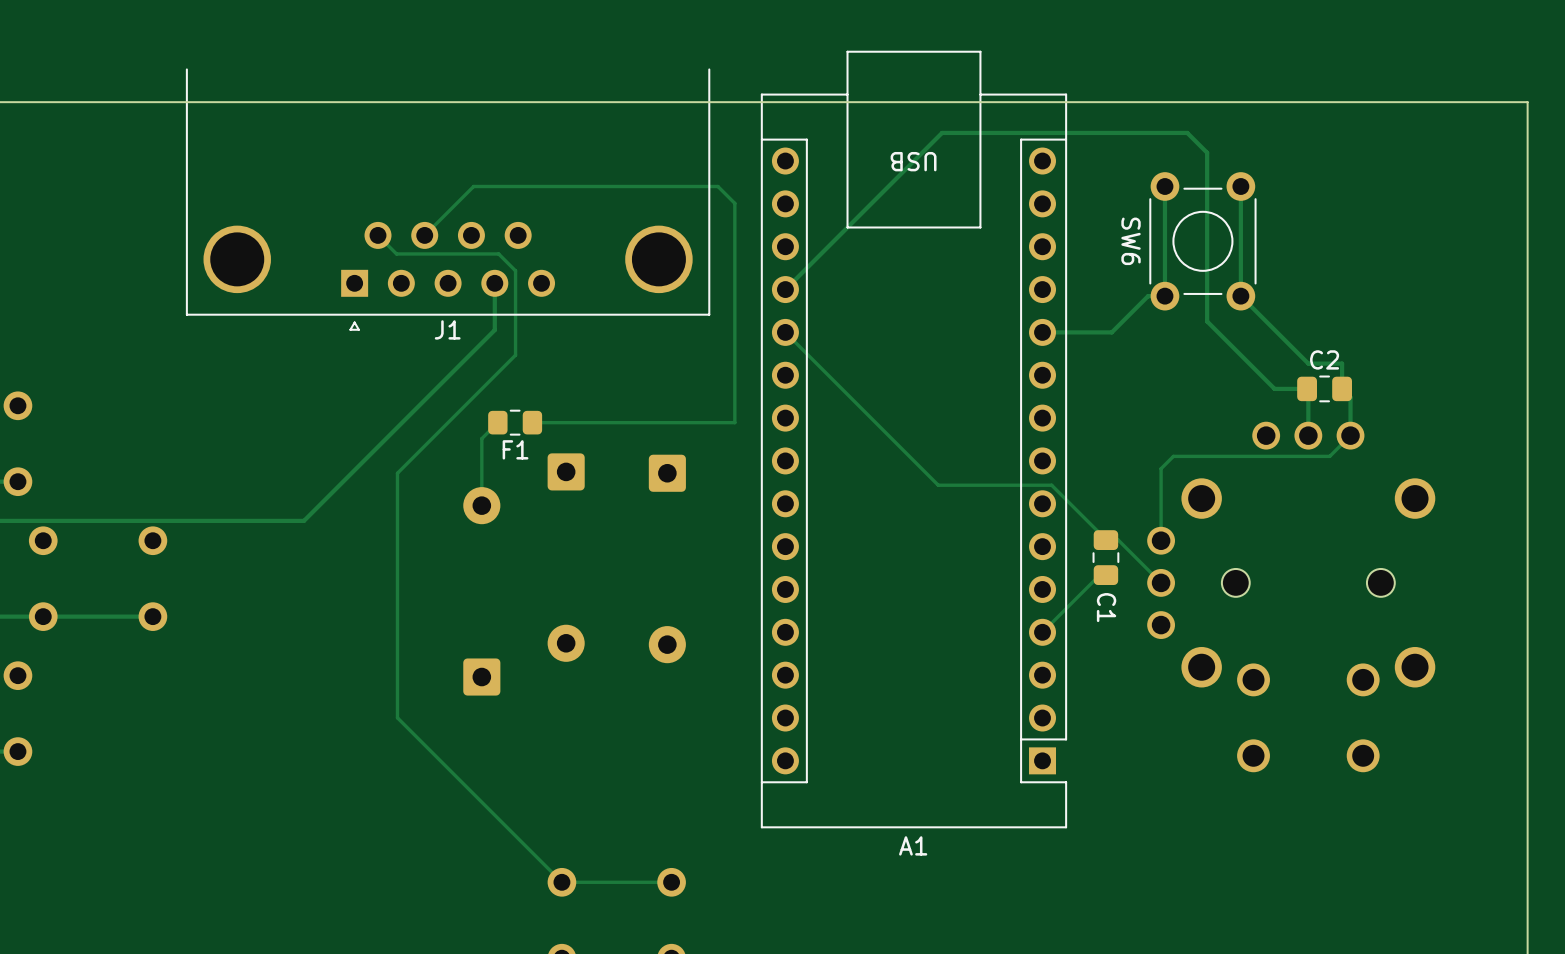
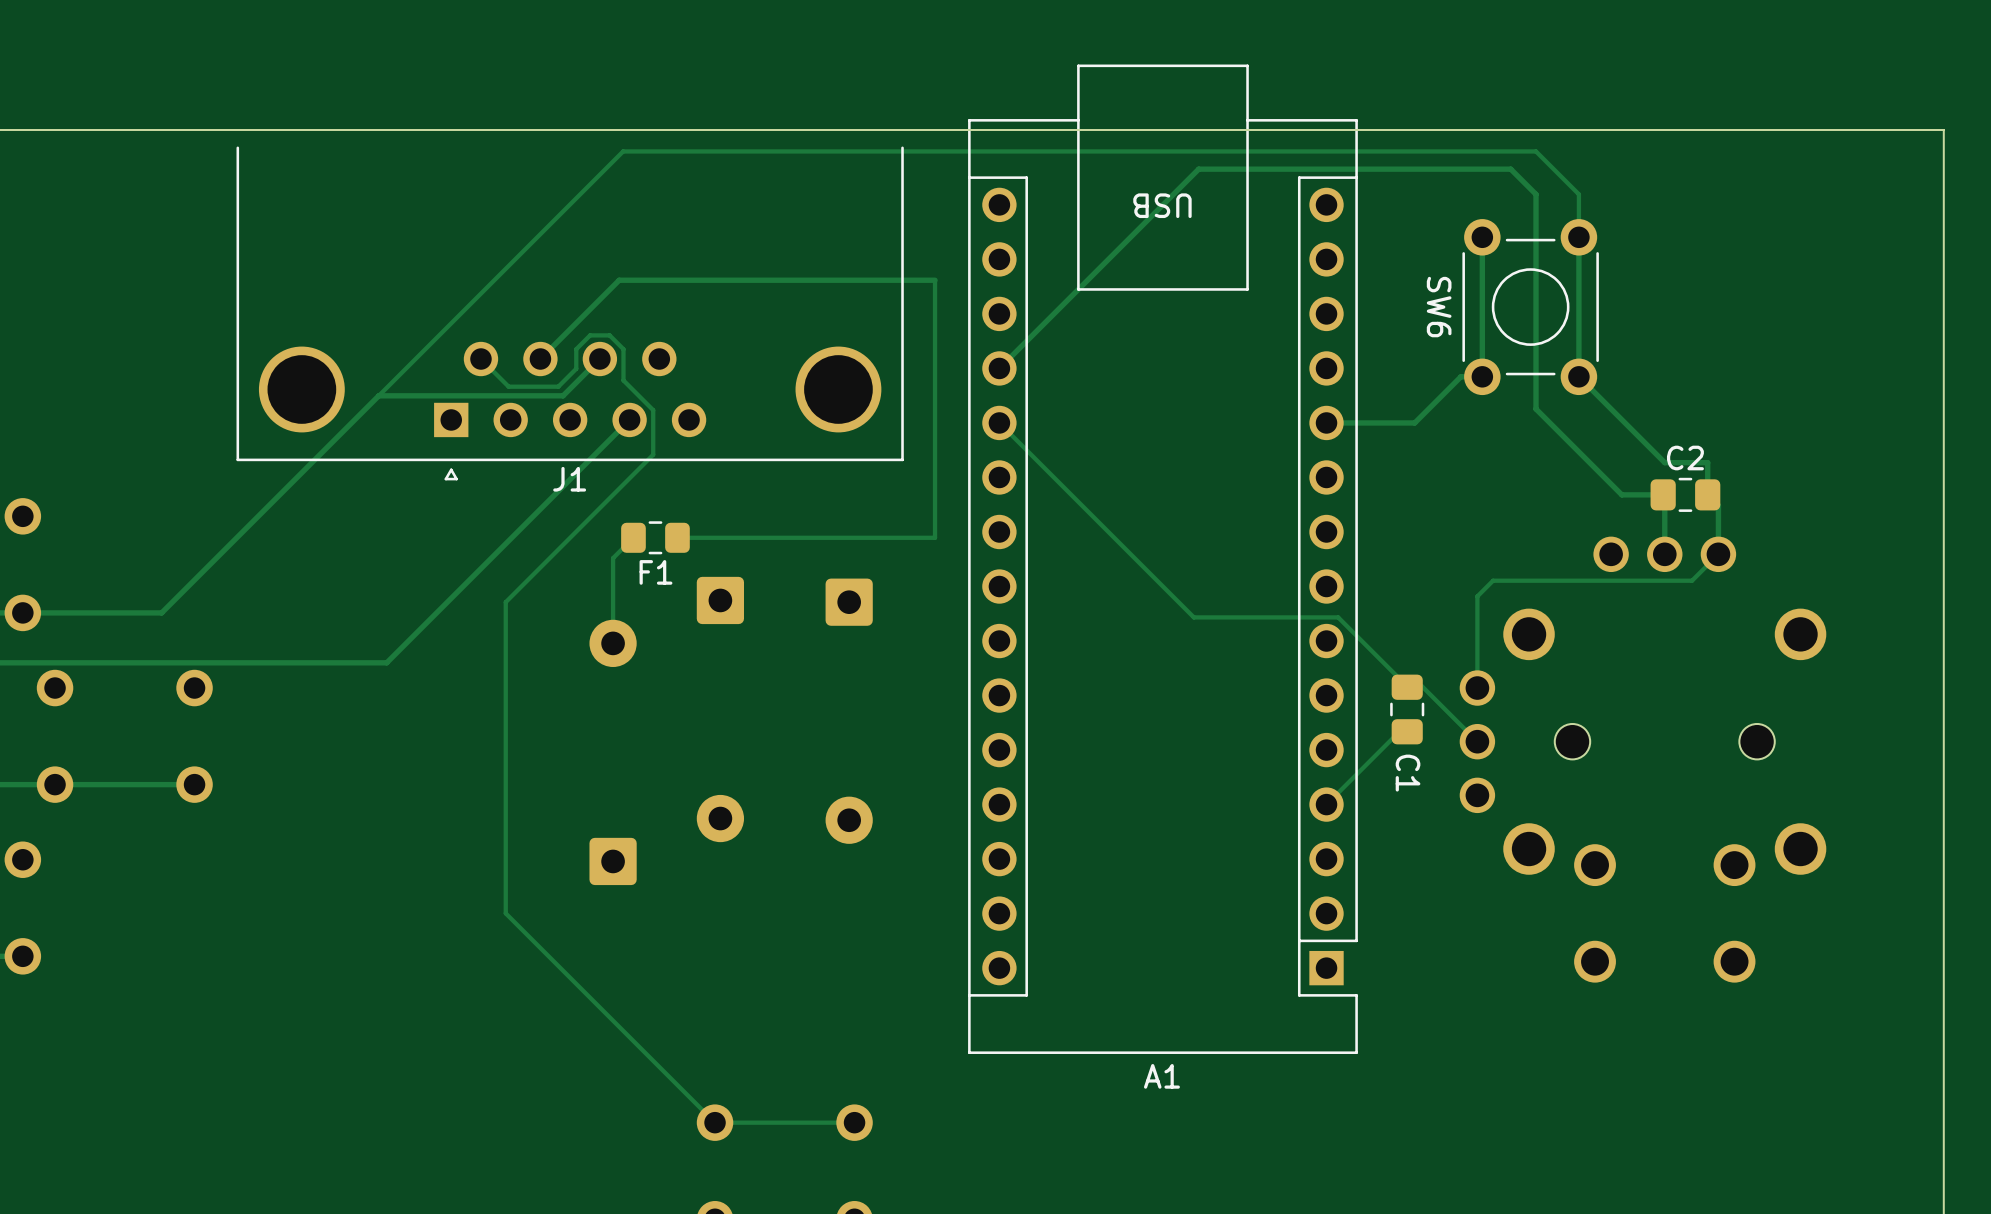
track: none -> (1578, 237) (1578, 194) (1536, 151) (623, 151) (378, 395)
J1 position: (448, 199) -> (570, 313)
track: (734, 220) (734, 203) (717, 186) (473, 186) (424, 235) -> (935, 280) (619, 280) (540, 359)
track: (378, 235) (396, 253) (498, 253) (515, 270) (515, 355) (513, 357) -> (576, 349) (590, 335) (609, 335) (623, 349) (623, 380) (653, 410) (653, 454)
track: none -> (480, 359) (508, 386) (558, 386) (576, 368)
track: none -> (599, 359) (563, 395) (378, 395)
track: (494, 283) (494, 330) -> none
track: none -> (378, 395) (161, 612) (22, 612)

